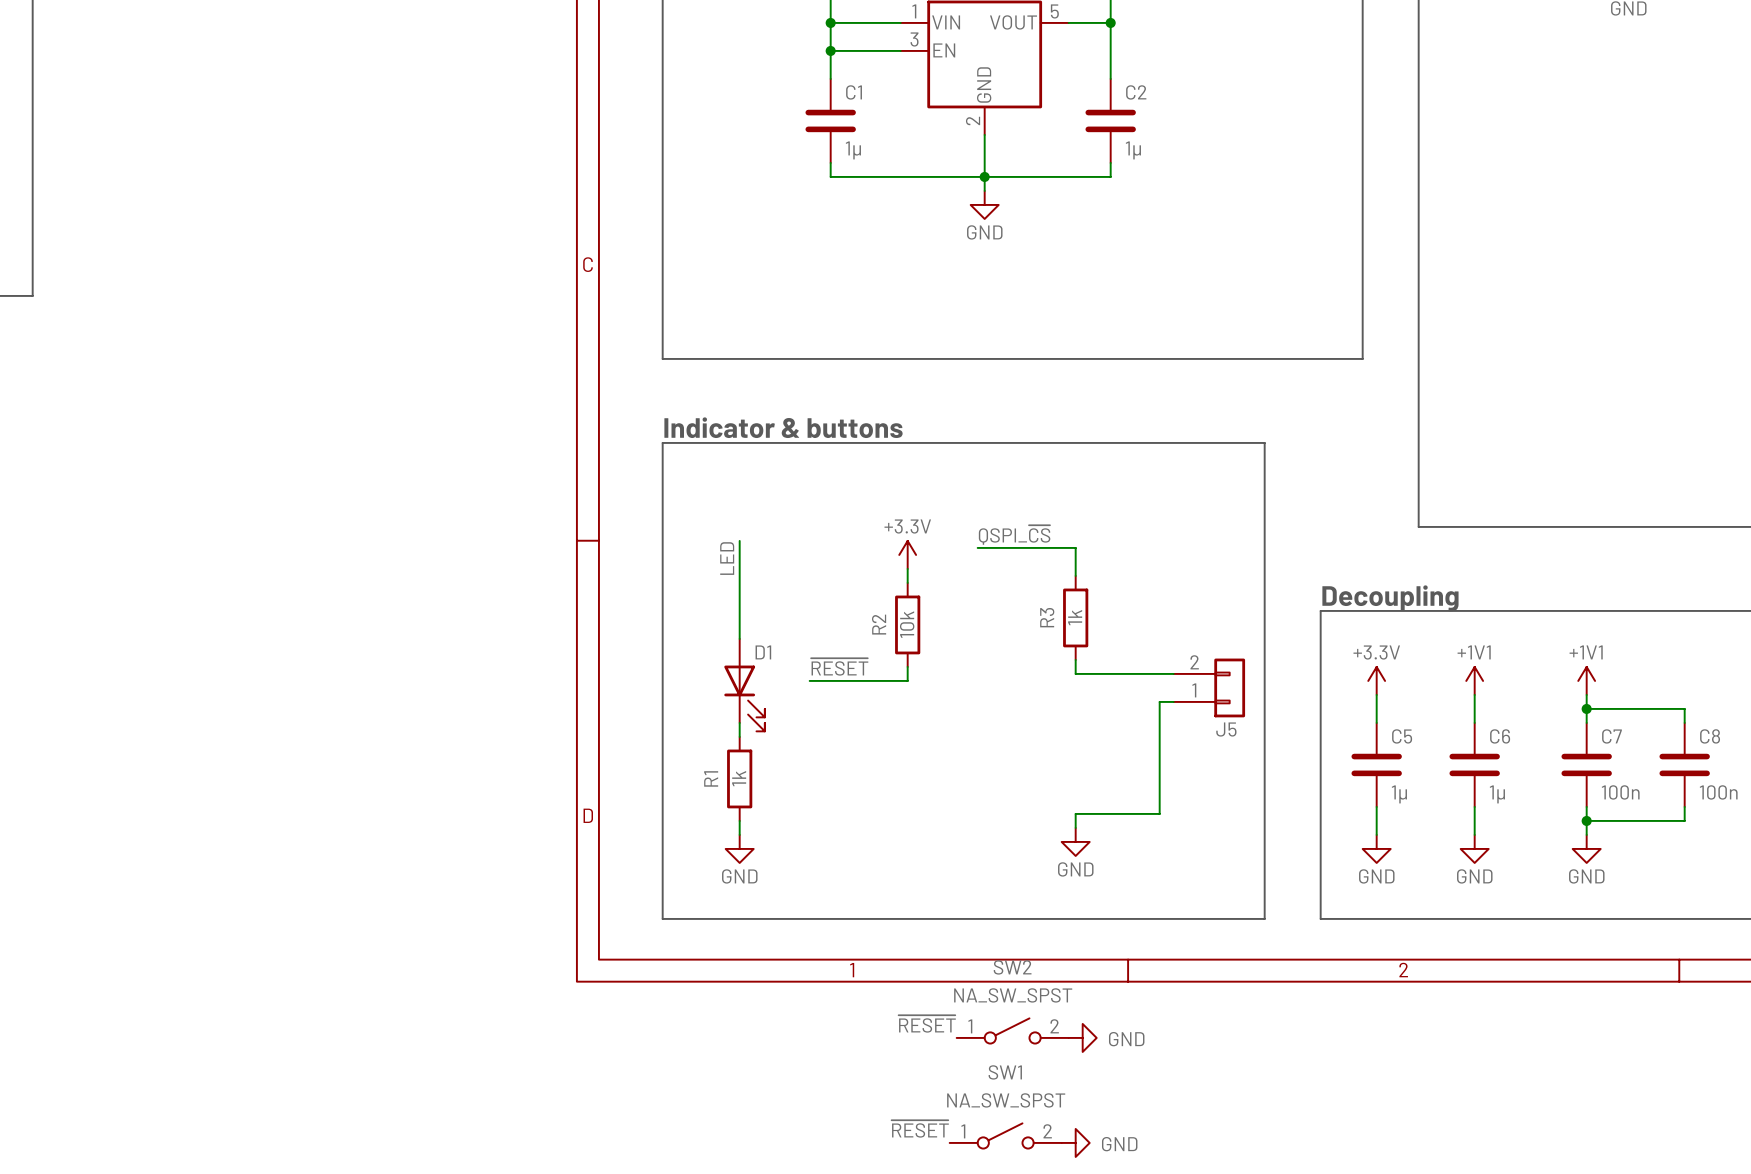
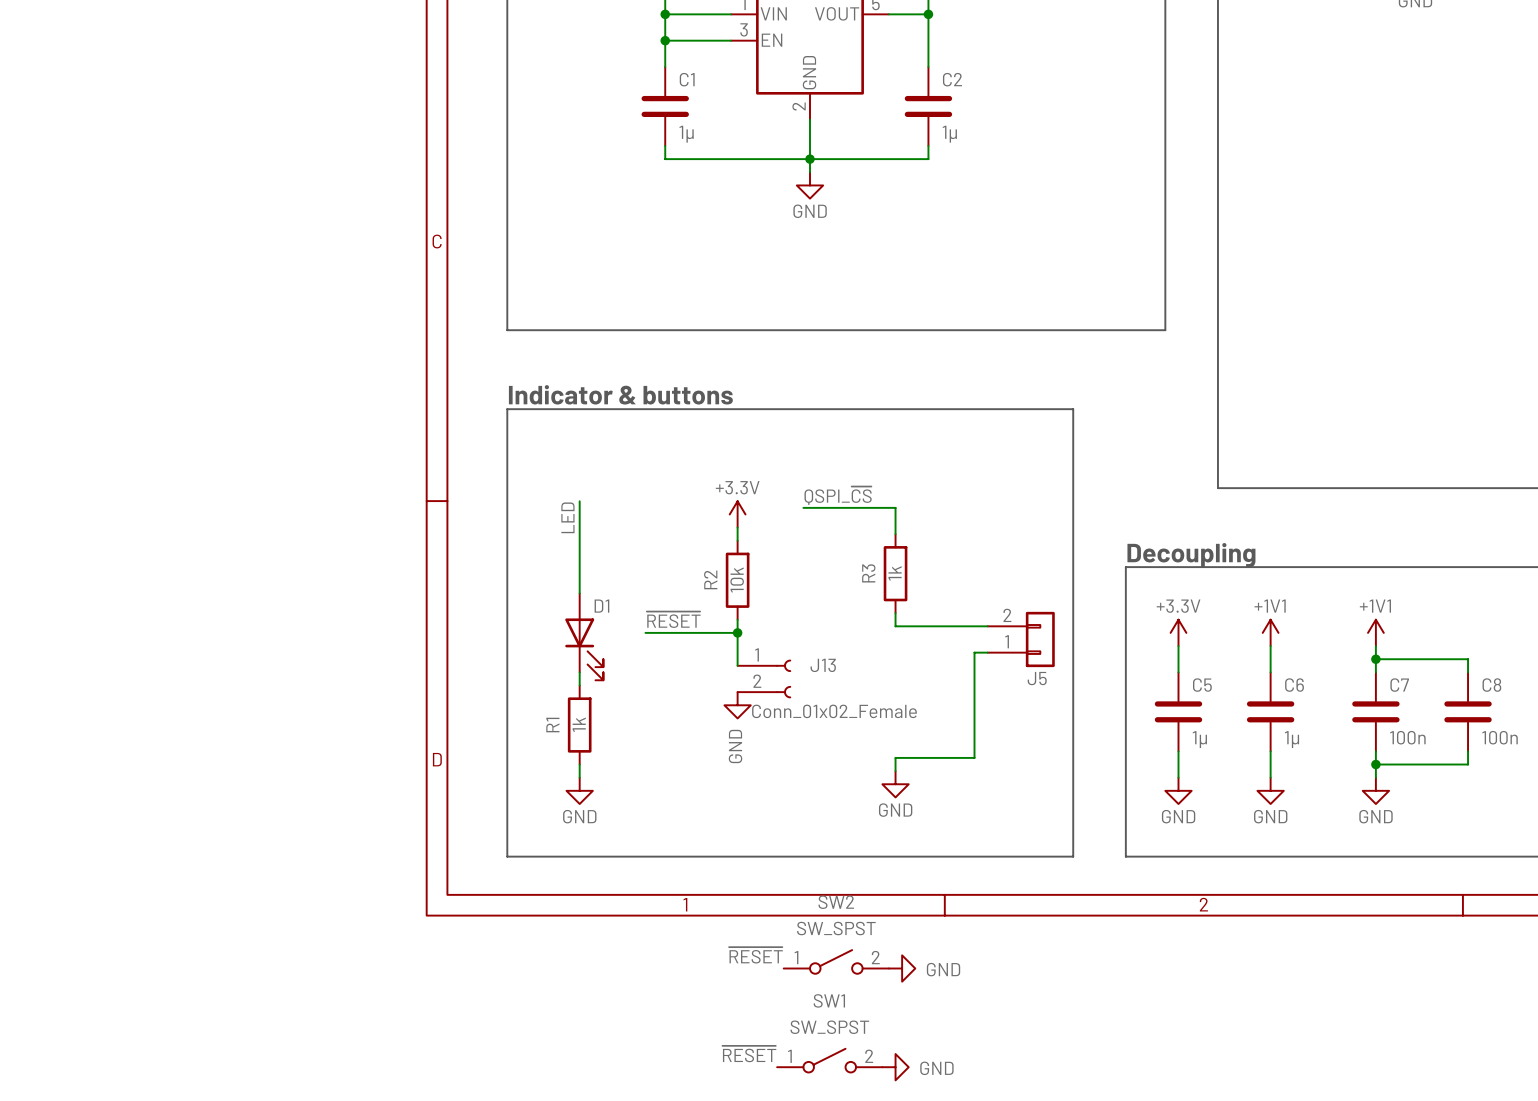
wire: none -> (737, 632) (737, 665)
junction: none -> (737, 632)
J13: none -> Conn_01x02_Female (764, 678)
power symbol: none -> GND (737, 705)
SW2 value: NA_SW_SPST (1013, 995) -> SW_SPST (836, 928)
SW1 value: NA_SW_SPST (1006, 1100) -> SW_SPST (829, 1027)

